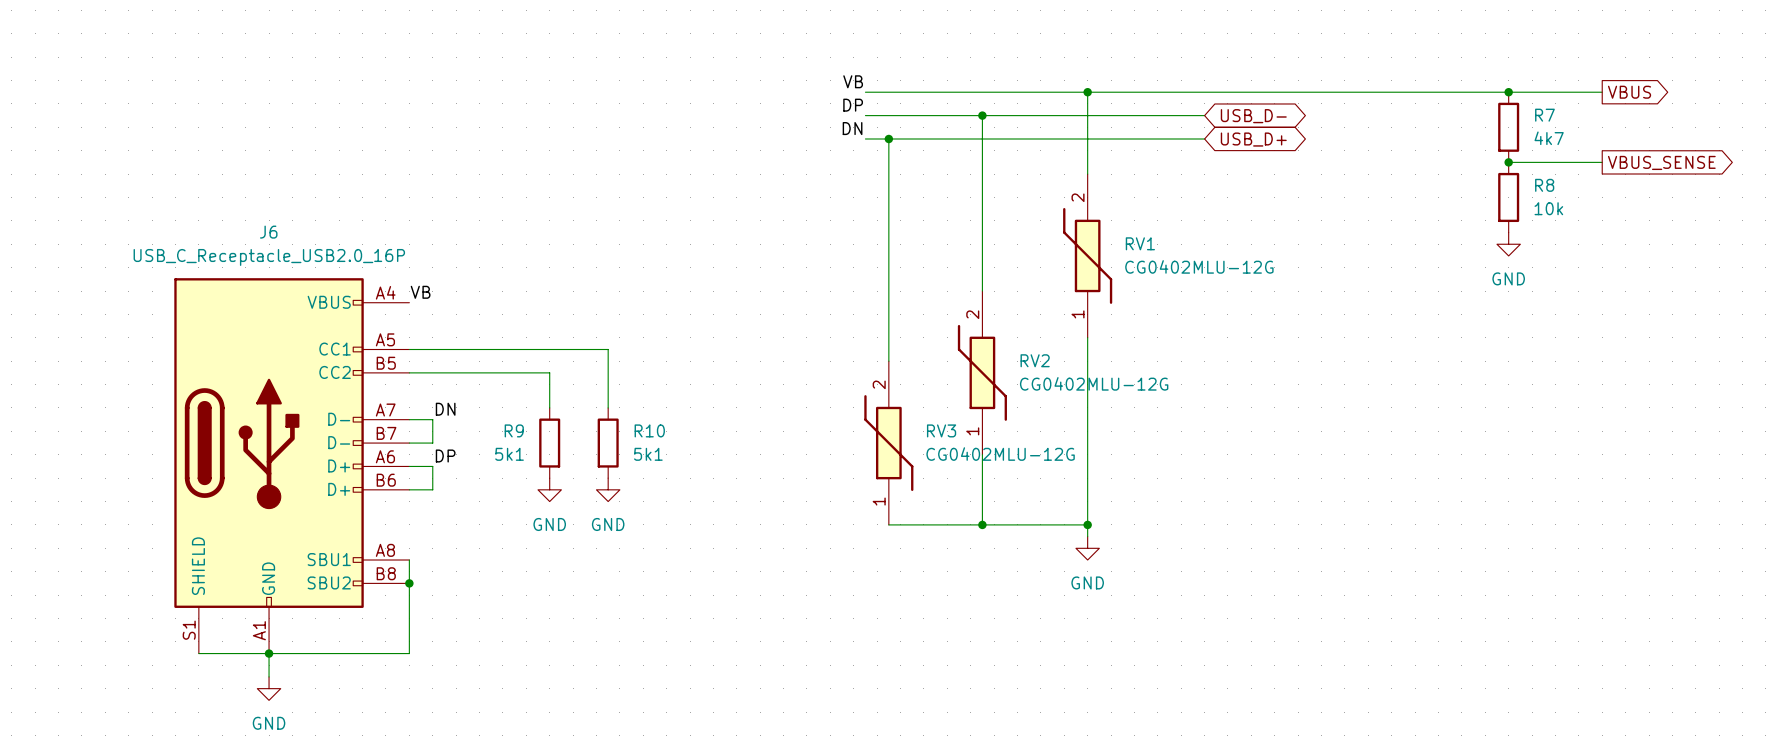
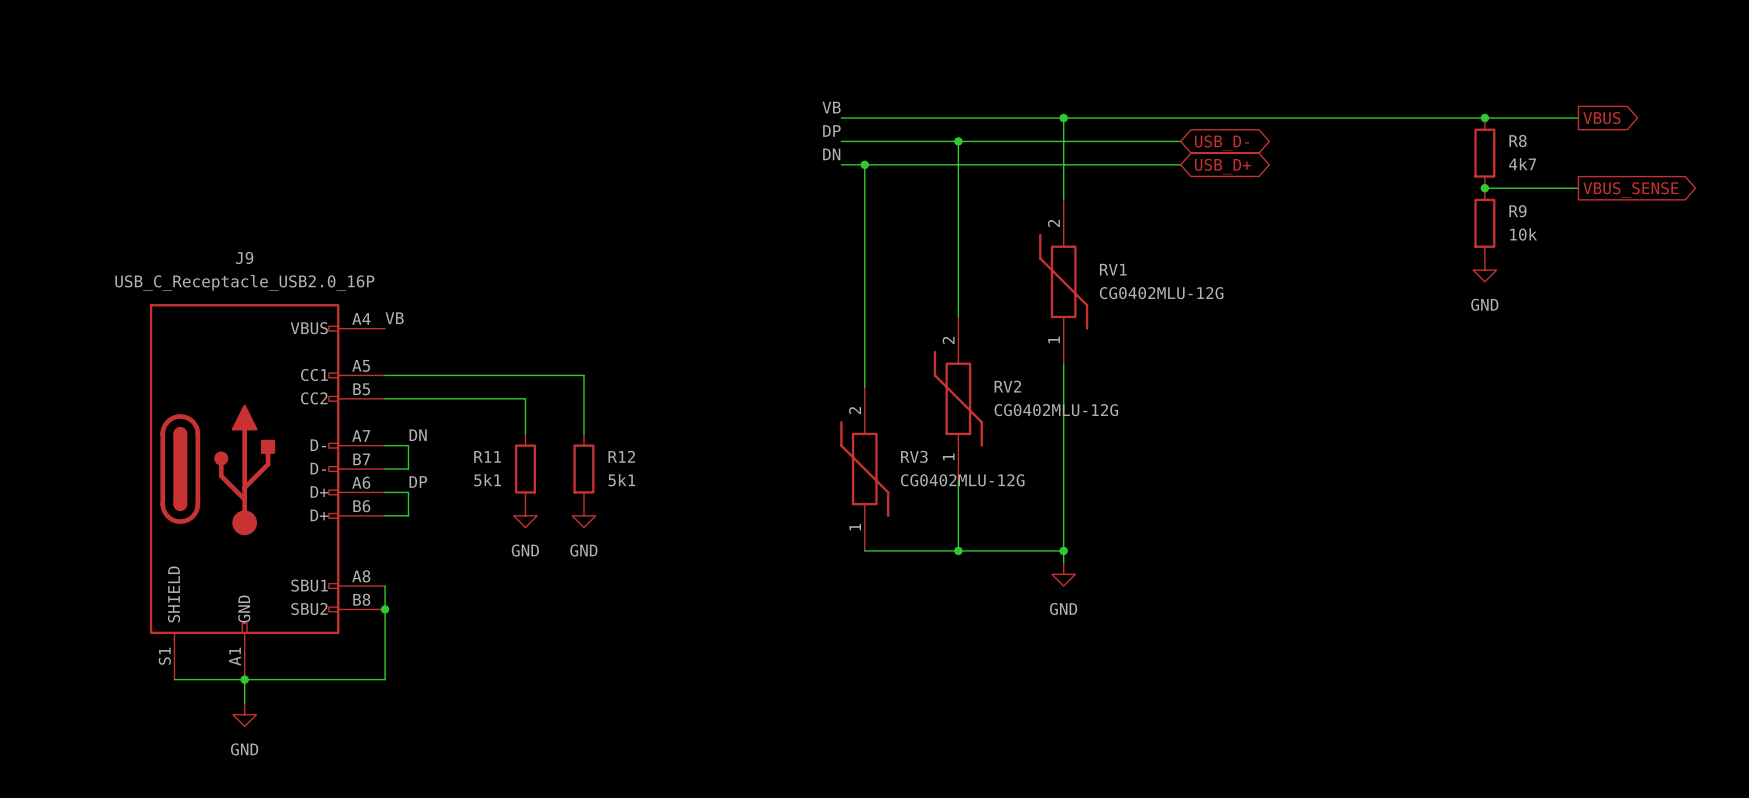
R7 name: R7 (1544, 115) -> R8 (1518, 141)
R8 name: R8 (1544, 185) -> R9 (1517, 211)
J6 name: J6 (268, 232) -> J9 (244, 258)
R9 name: R9 (514, 430) -> R11 (487, 456)
R10 name: R10 (649, 430) -> R12 (621, 456)

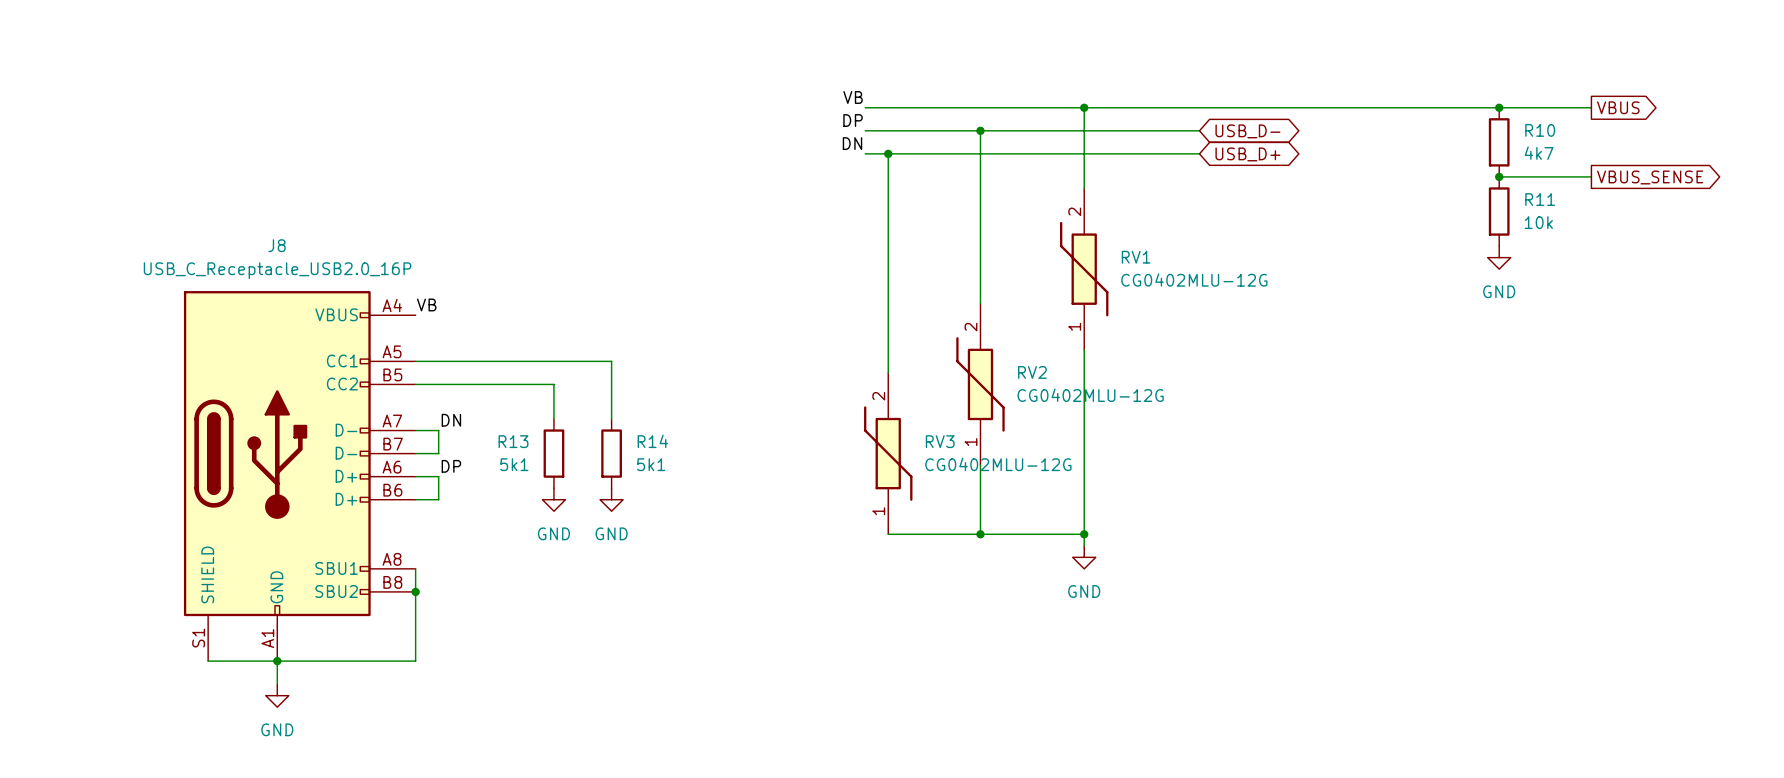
R8 name: R8 (1518, 141) -> R10 (1540, 130)
R9 name: R9 (1517, 211) -> R11 (1540, 199)
J9 name: J9 (244, 258) -> J8 (277, 245)
R11 name: R11 (487, 456) -> R13 (513, 441)
R12 name: R12 (621, 456) -> R14 (652, 441)

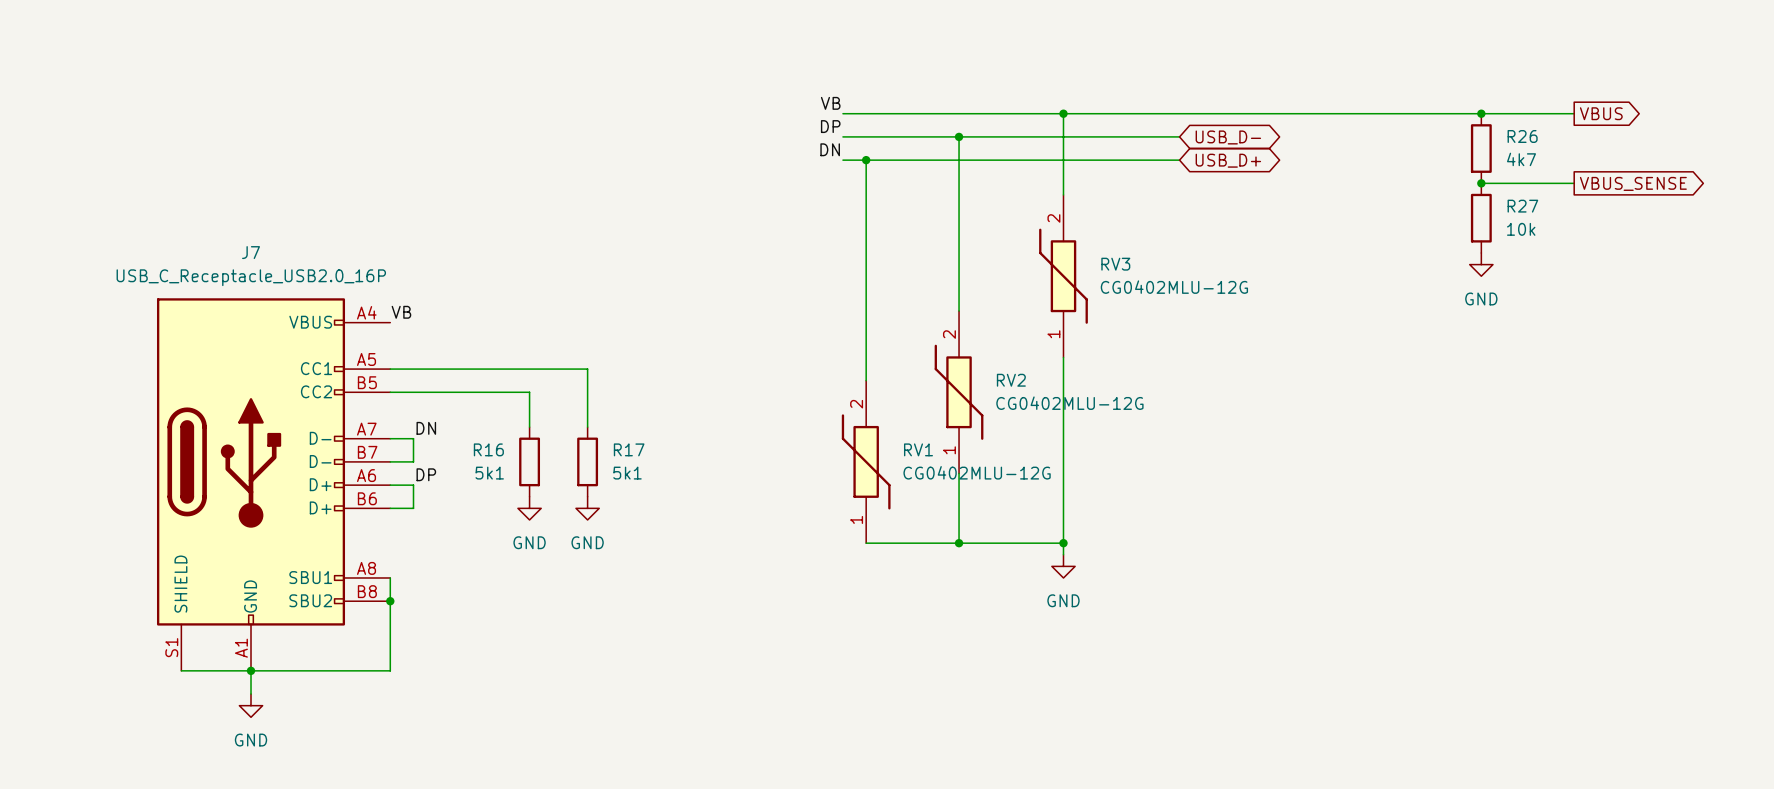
R10 name: R10 (1540, 130) -> R26 (1522, 136)
R11 name: R11 (1540, 199) -> R27 (1522, 206)
J8 name: J8 (277, 245) -> J7 (251, 252)
RV1 name: RV1 (1136, 257) -> RV3 (1115, 264)
R13 name: R13 (513, 441) -> R16 (488, 449)
R14 name: R14 (652, 441) -> R17 (629, 449)
RV3 name: RV3 (940, 441) -> RV1 (918, 449)

